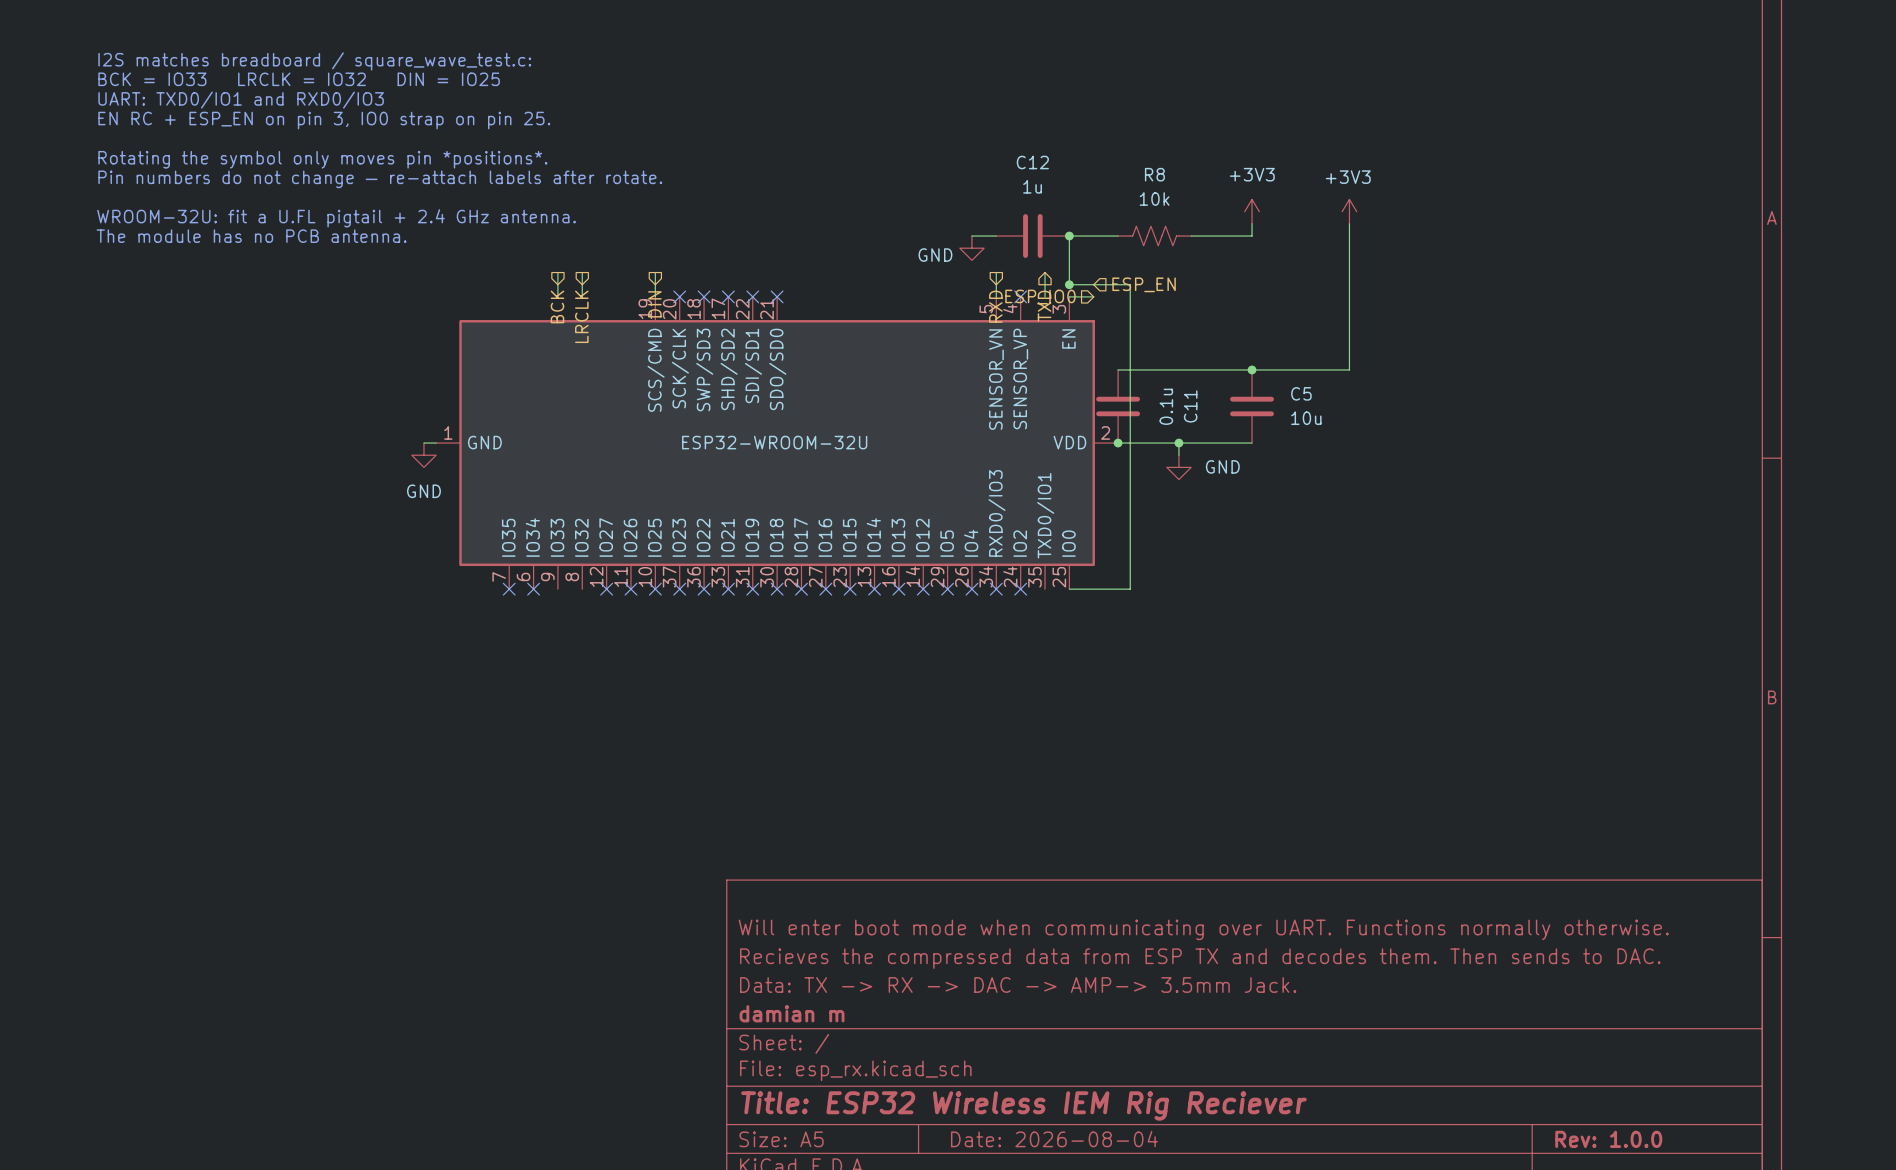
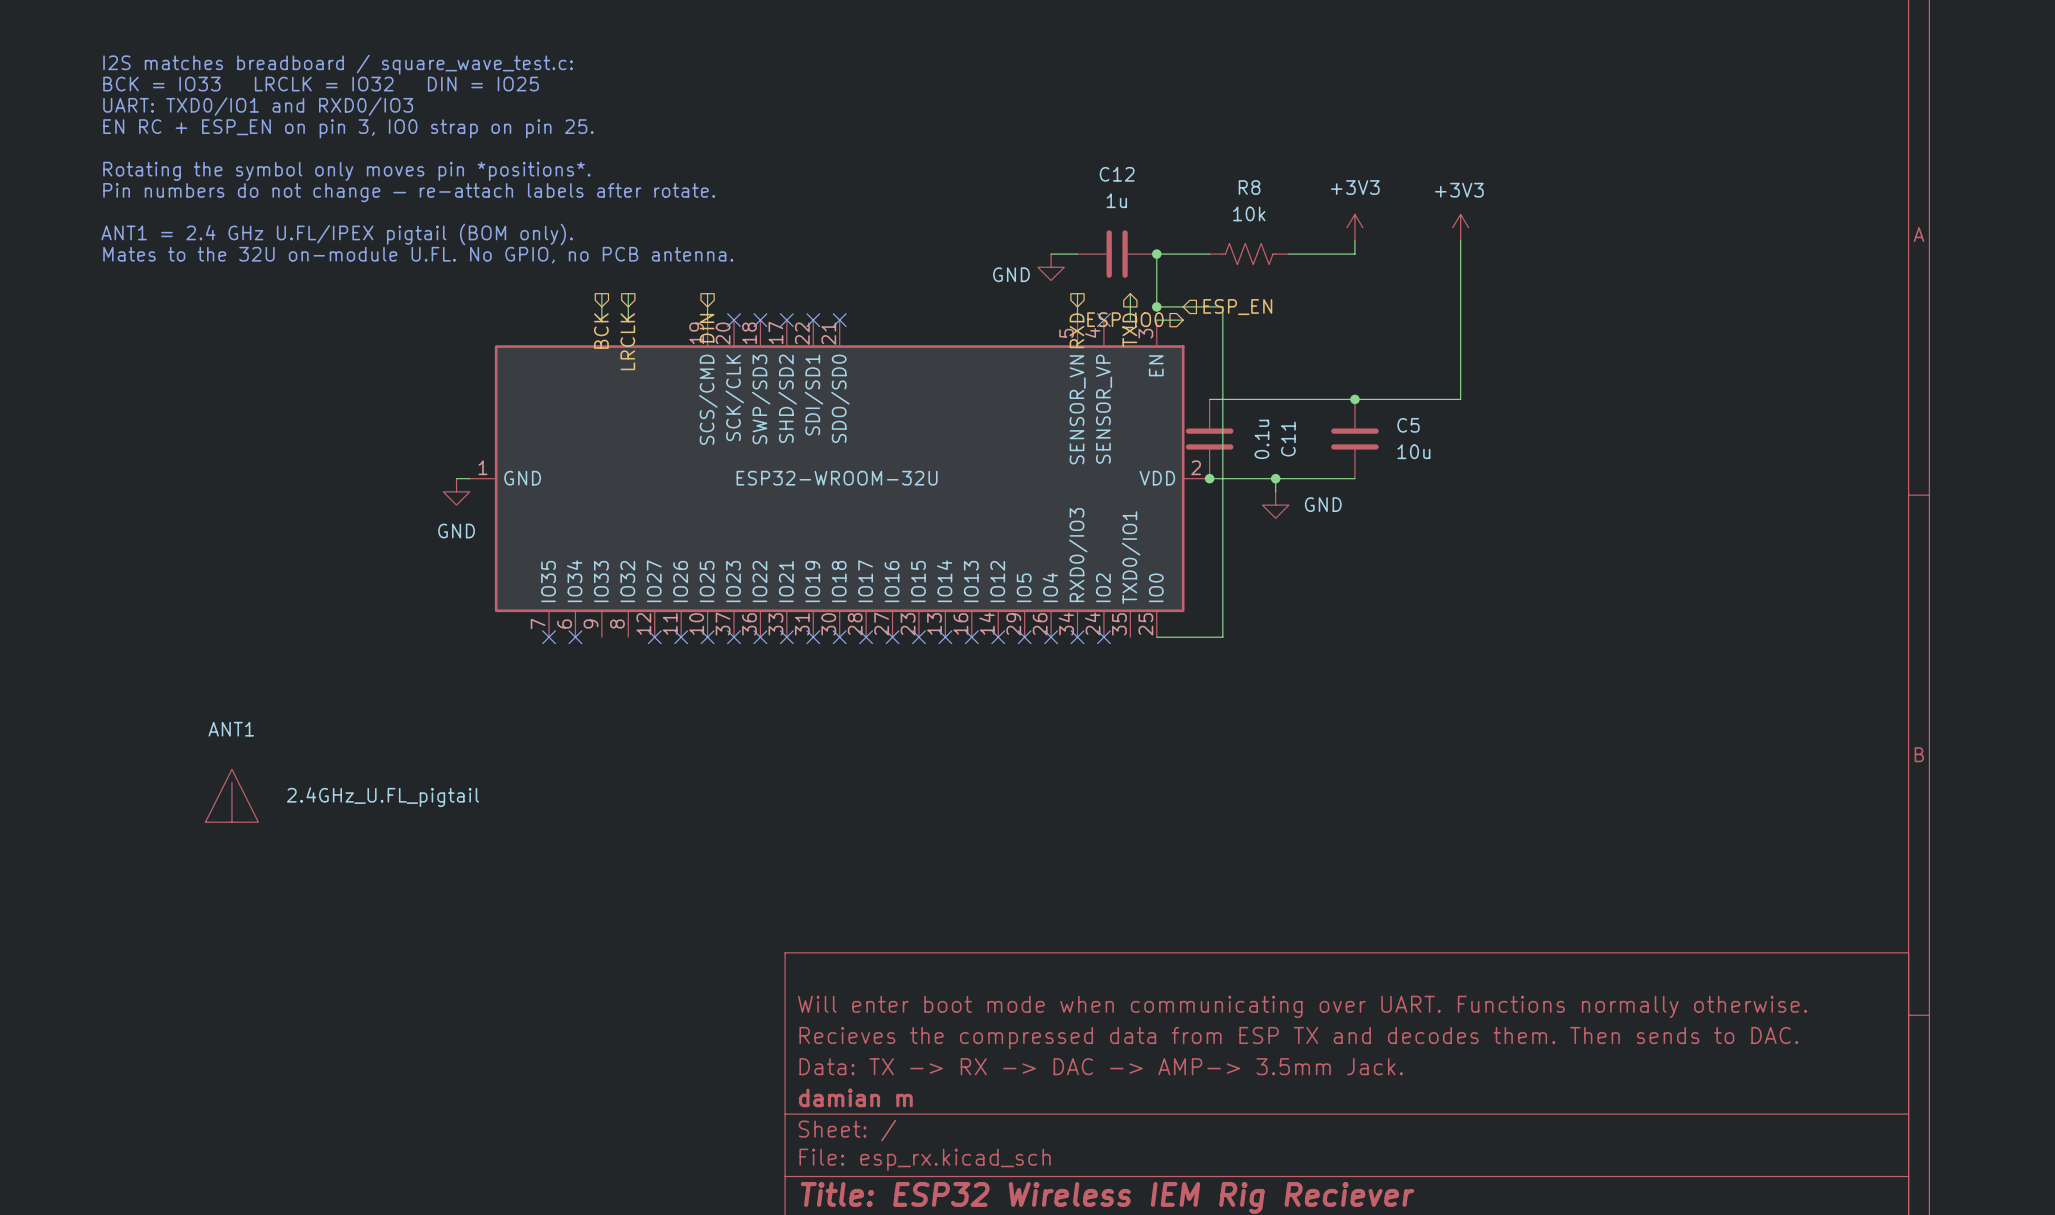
text: WROOM-32U: fit a U.FL pigtail + 2.4 GHz antenna. (336, 218) -> ANT1 = 2.4 GHz U.FL/IPEX pigtail (BOM only). (337, 234)
text: The module has no PCB antenna. (251, 236) -> Mates to the 32U on-module U.FL. No GPIO, no PCB antenna. (418, 255)
ANT1: none -> 2.4GHz_U.FL_pigtail (231, 795)

